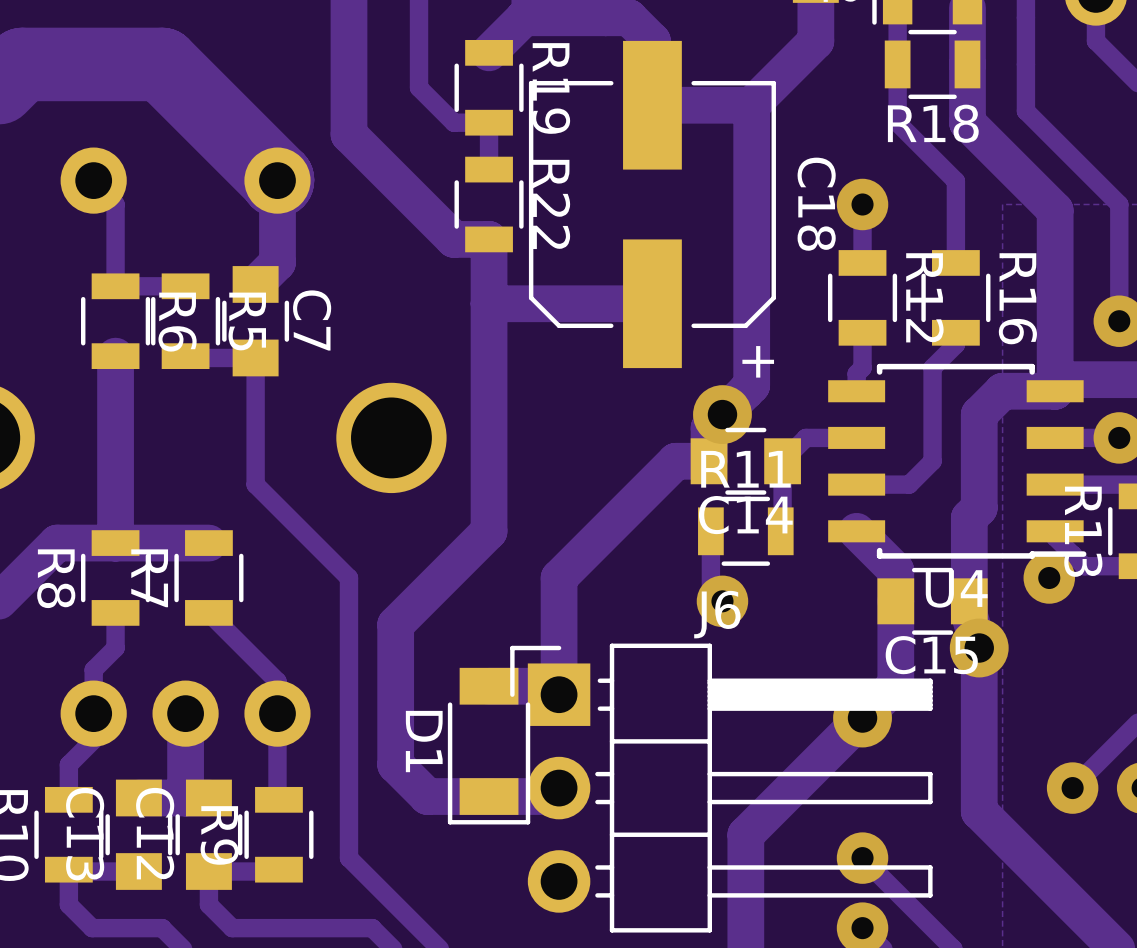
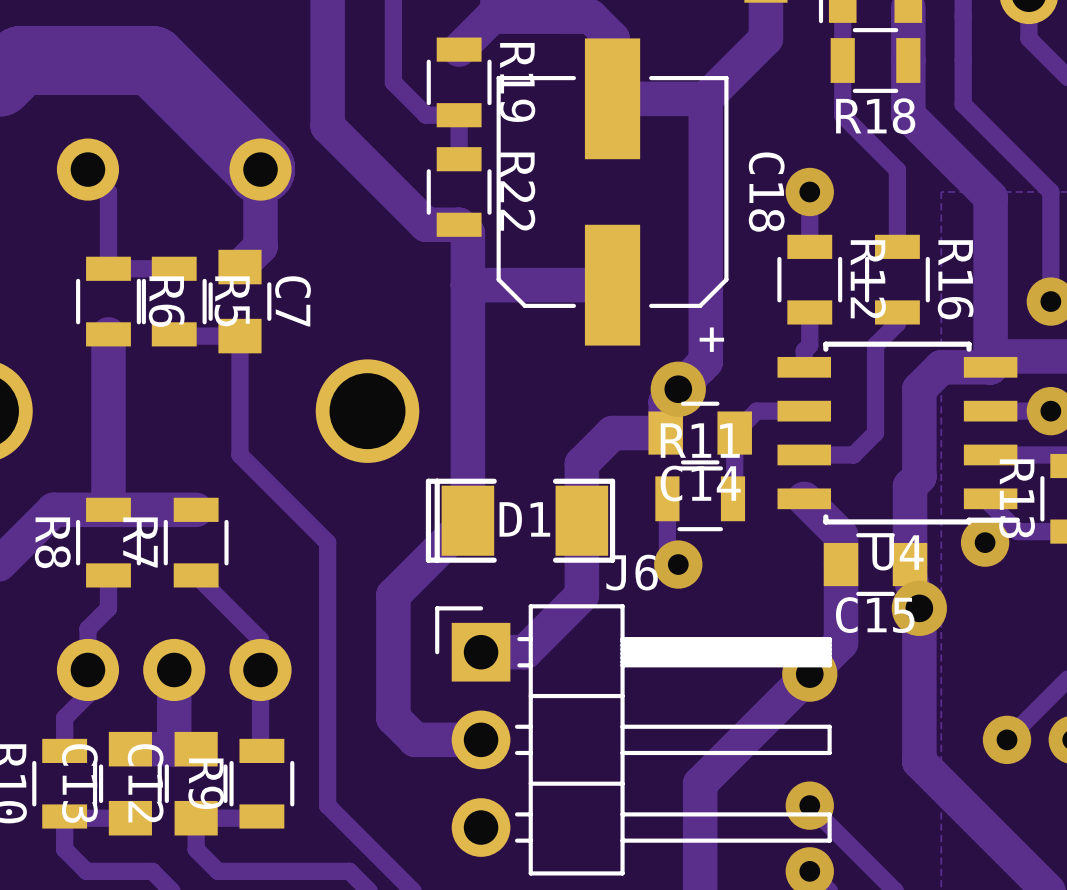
track: (489, 239) (489, 531) (395, 624) (395, 764) (427, 796) (550, 796) (559, 788) -> (459, 224) (467, 233) (467, 520) (393, 595) (393, 717) (415, 739) (481, 739) (473, 747)
track: (675, 461) (559, 577) (559, 694) (550, 686) (489, 686) -> (634, 433) (612, 433) (581, 463) (581, 595) (524, 652) (481, 652)
D1 footprint: [447, 667, 531, 825] -> [425, 478, 616, 563]
J6 position: (721, 788) -> (633, 739)

